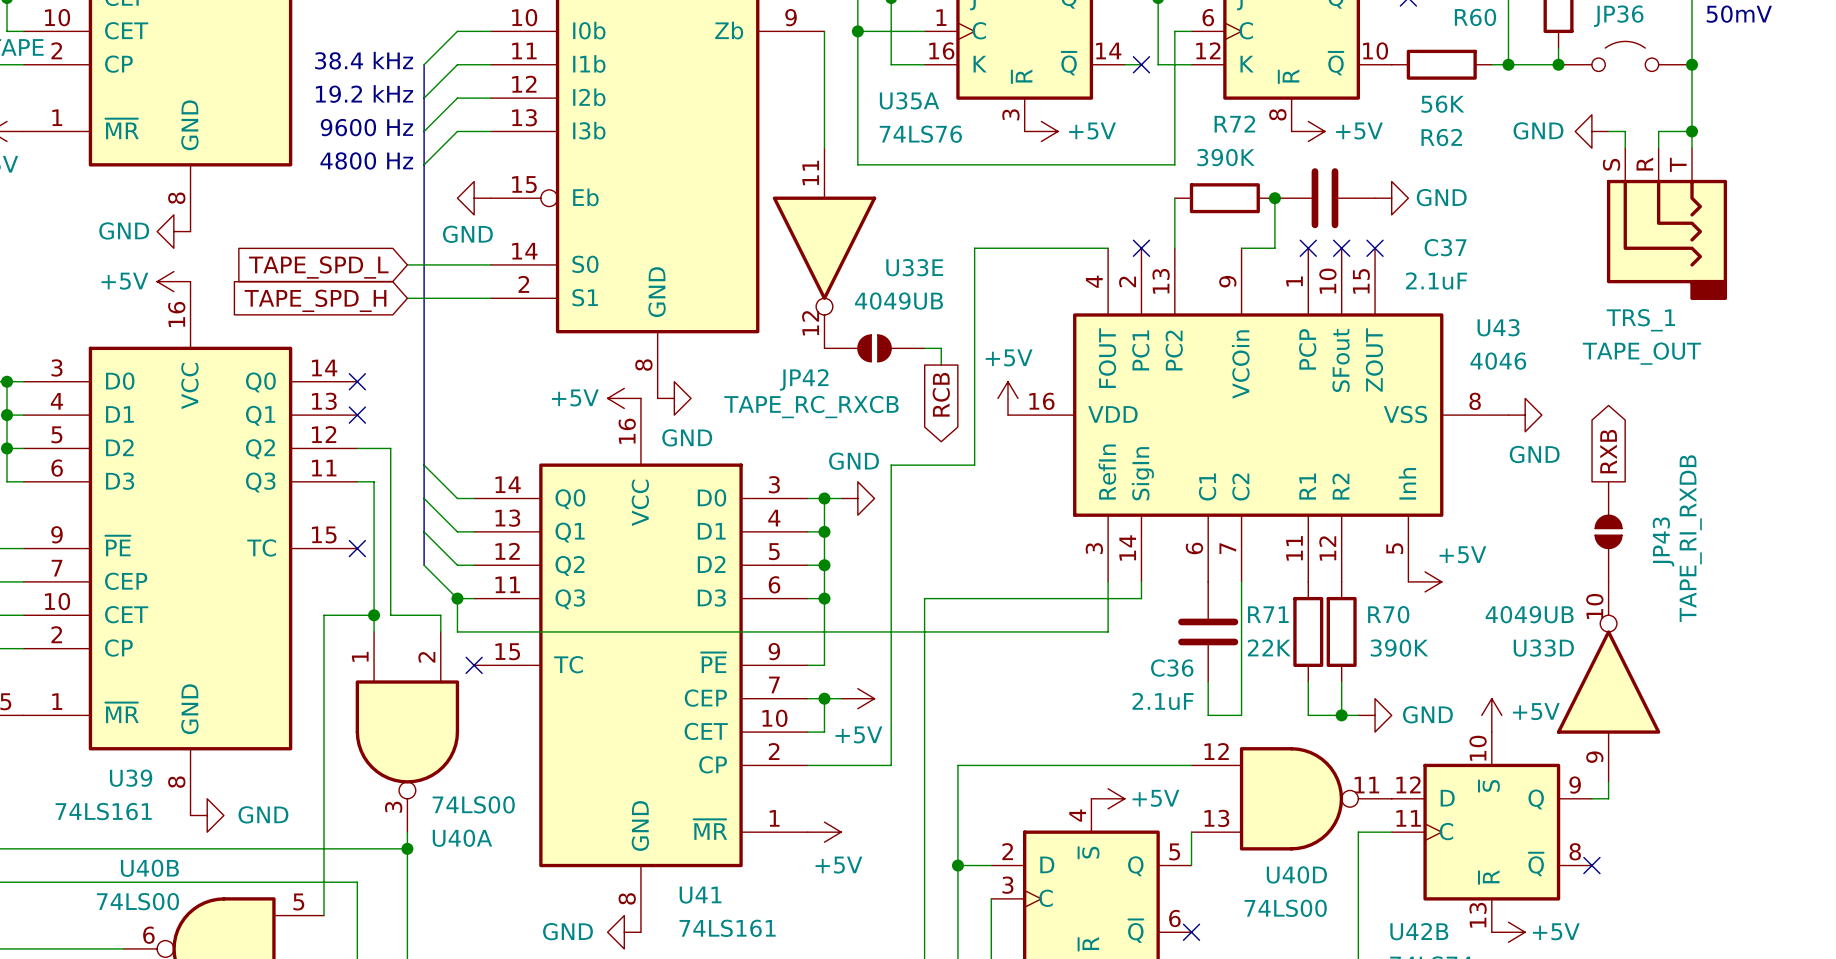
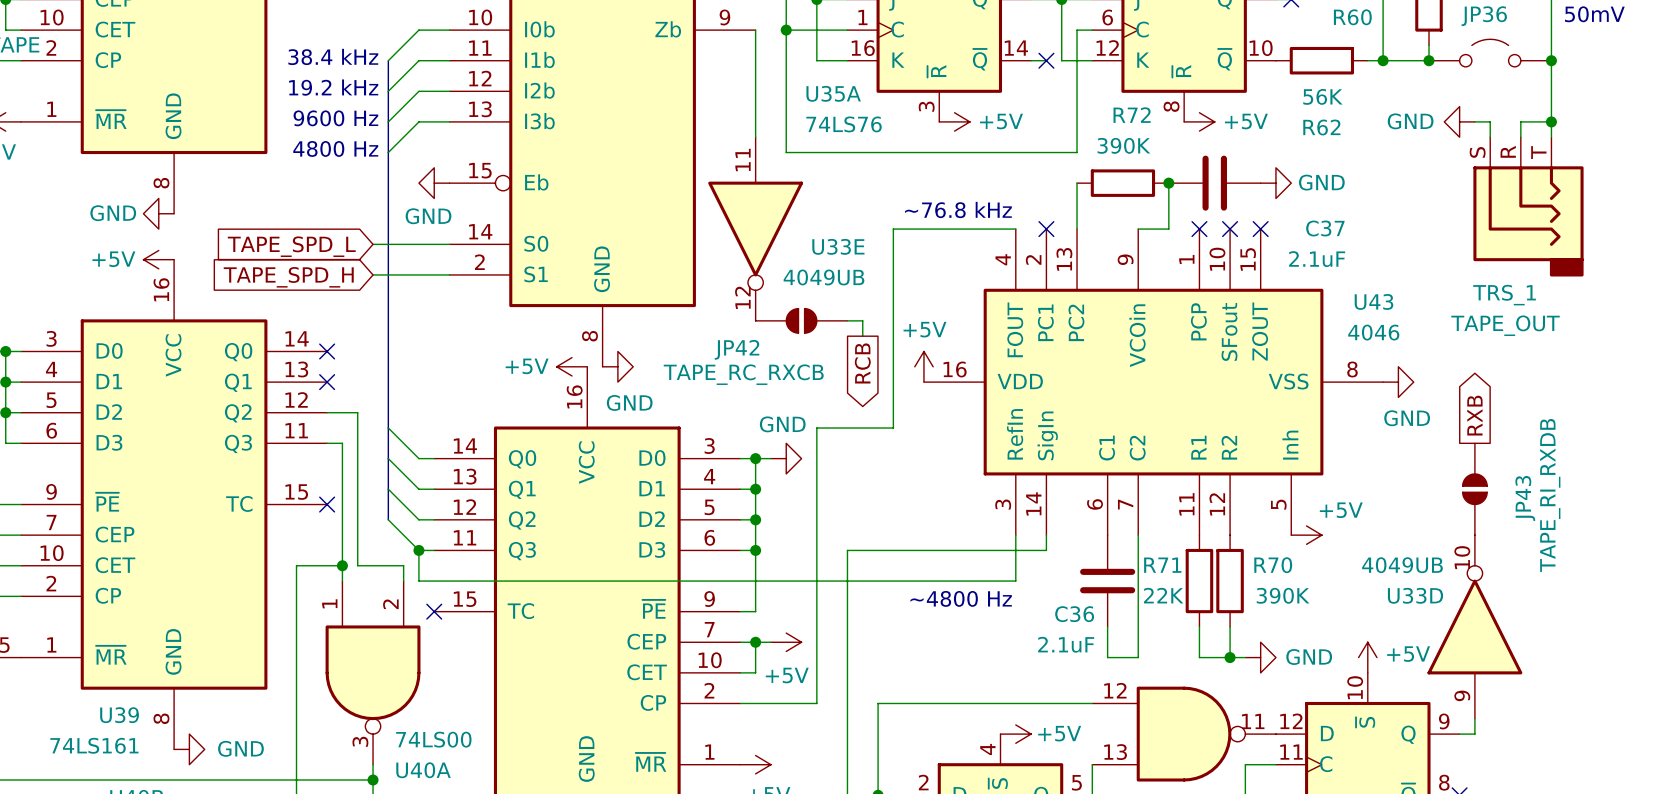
text: none -> ~76.8 kHz (958, 209)
text: none -> ~4800 Hz (961, 598)

